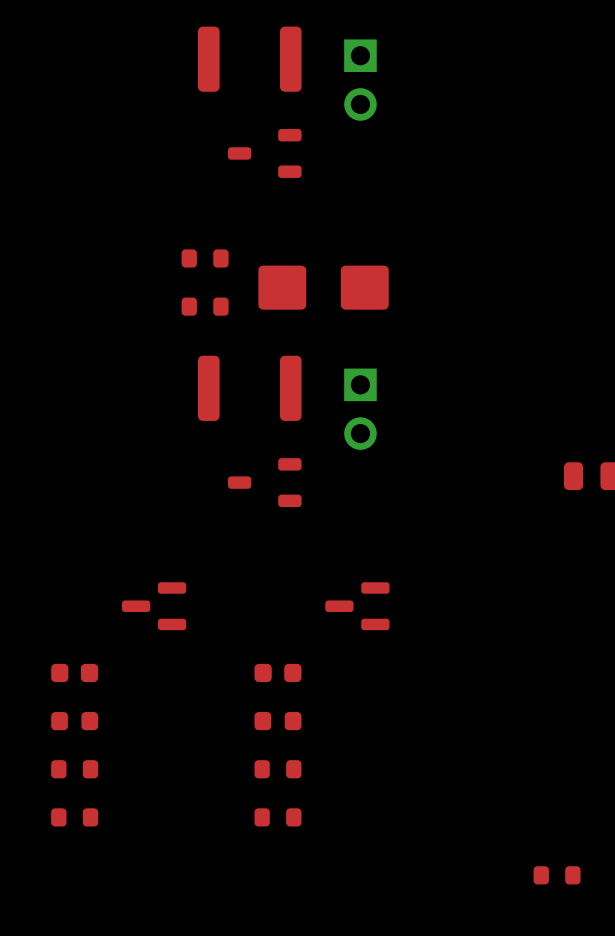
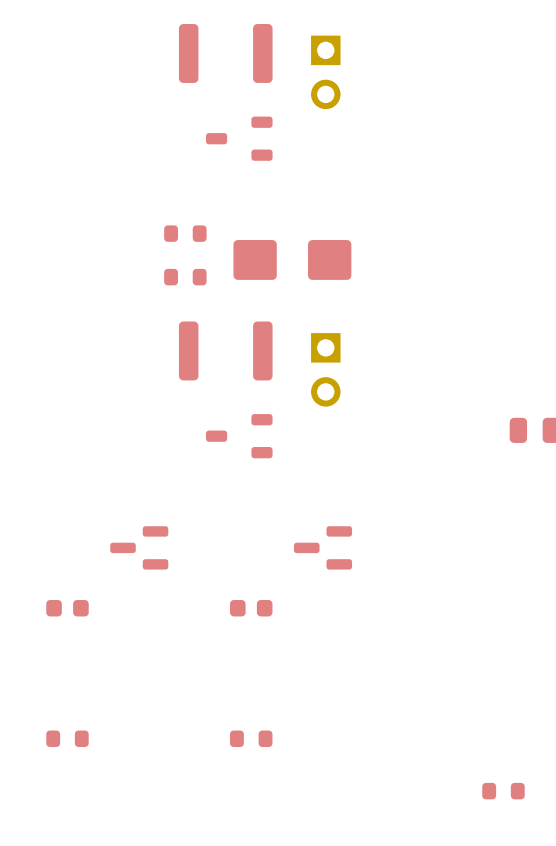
part: (74, 721) -> none
part: (277, 721) -> none
part: (74, 769) -> none
part: (277, 769) -> none

